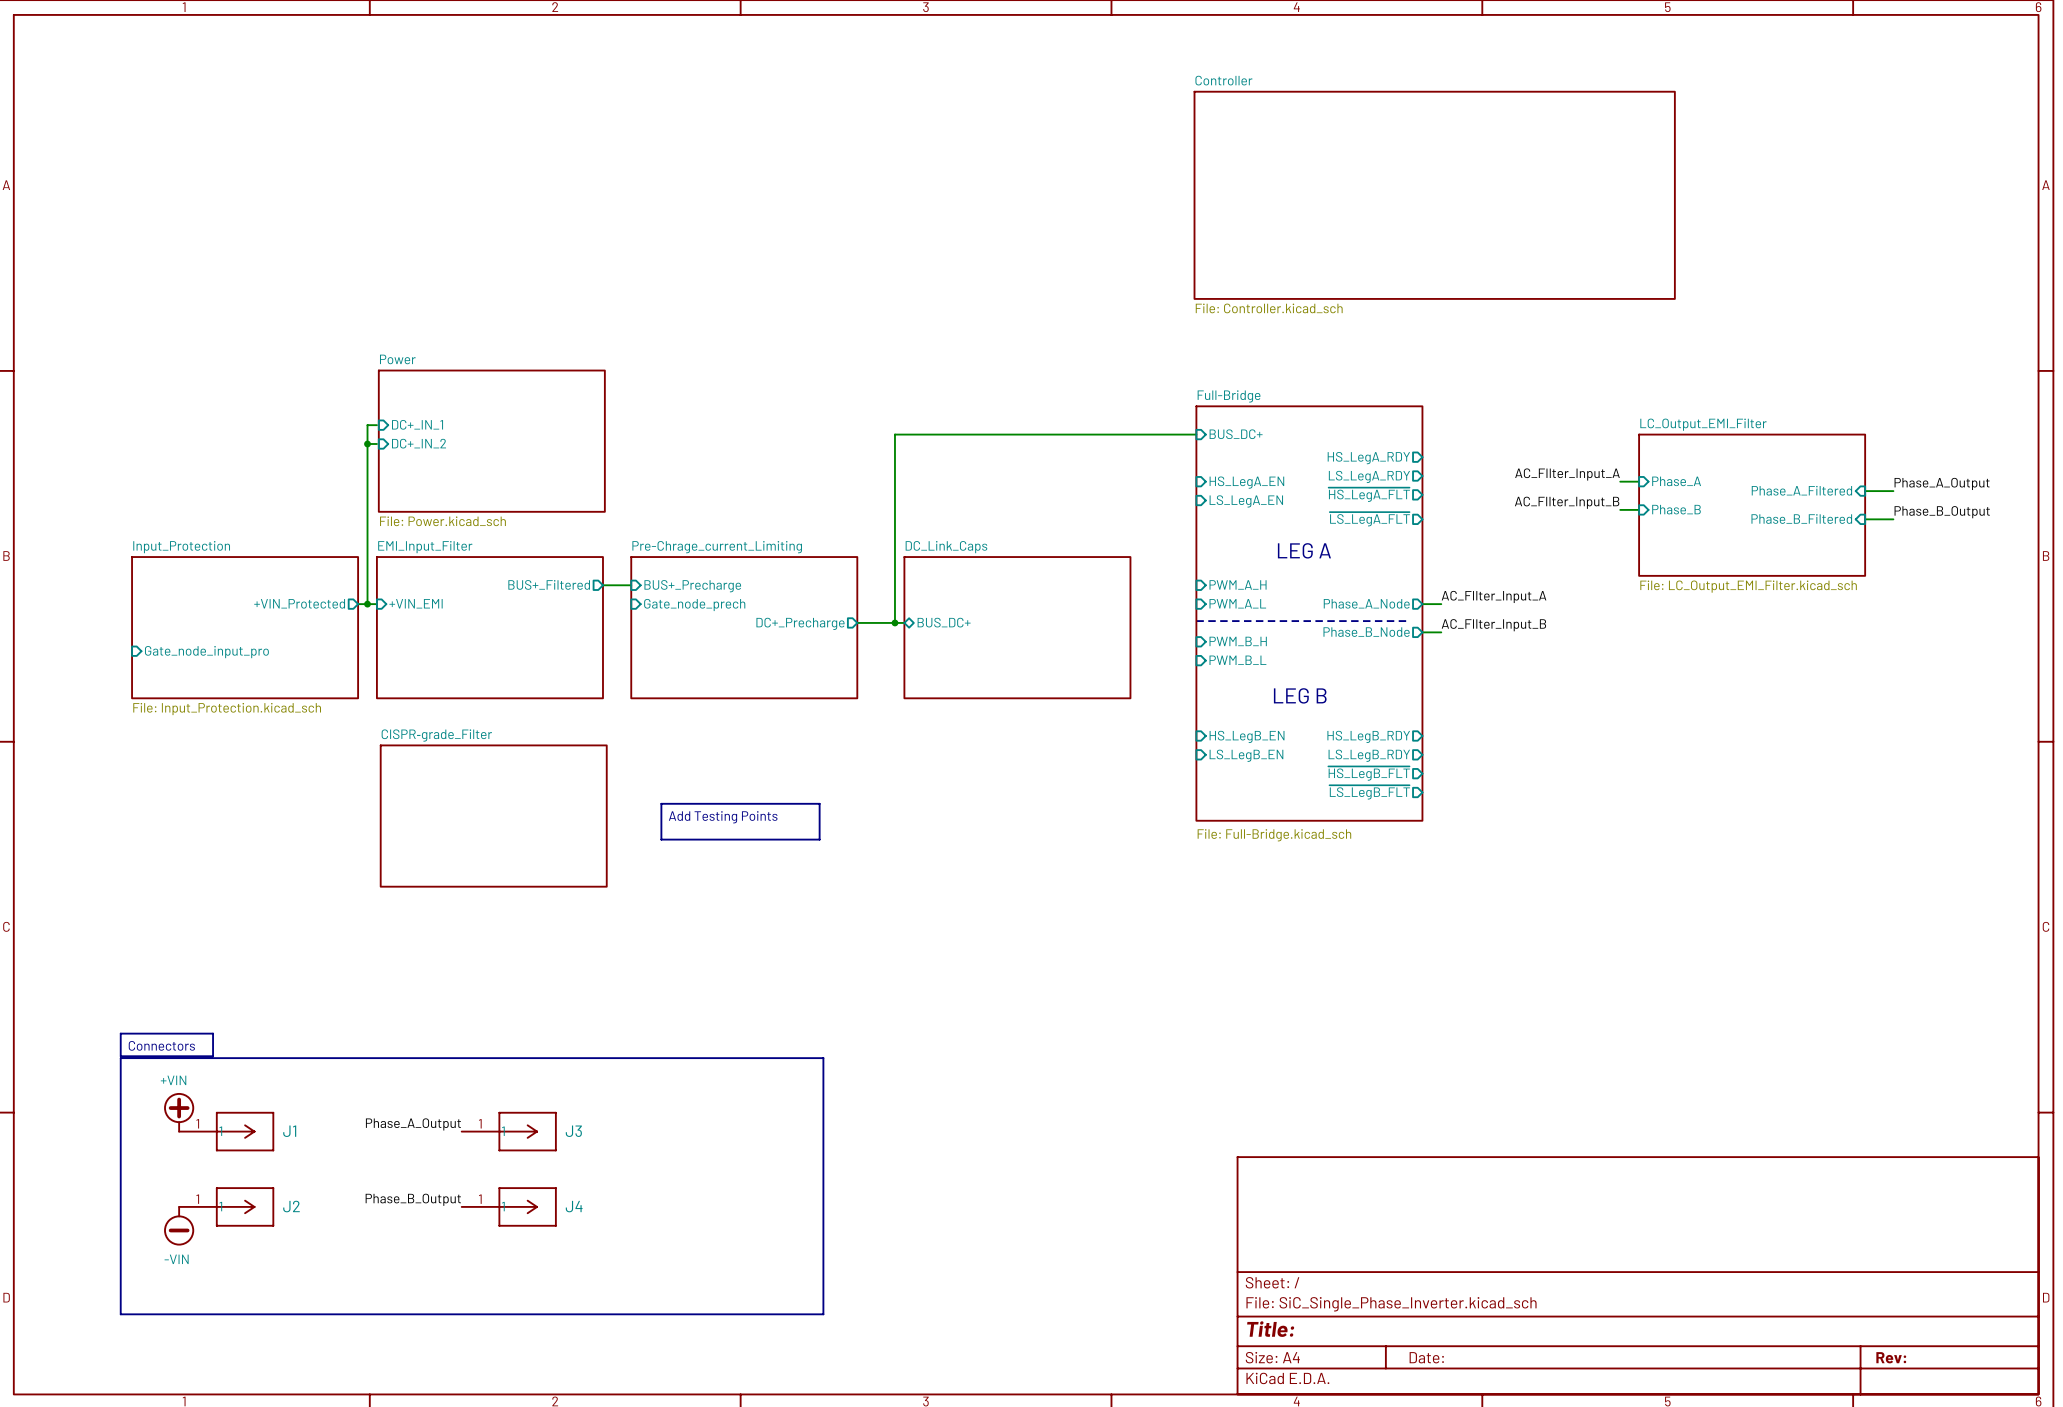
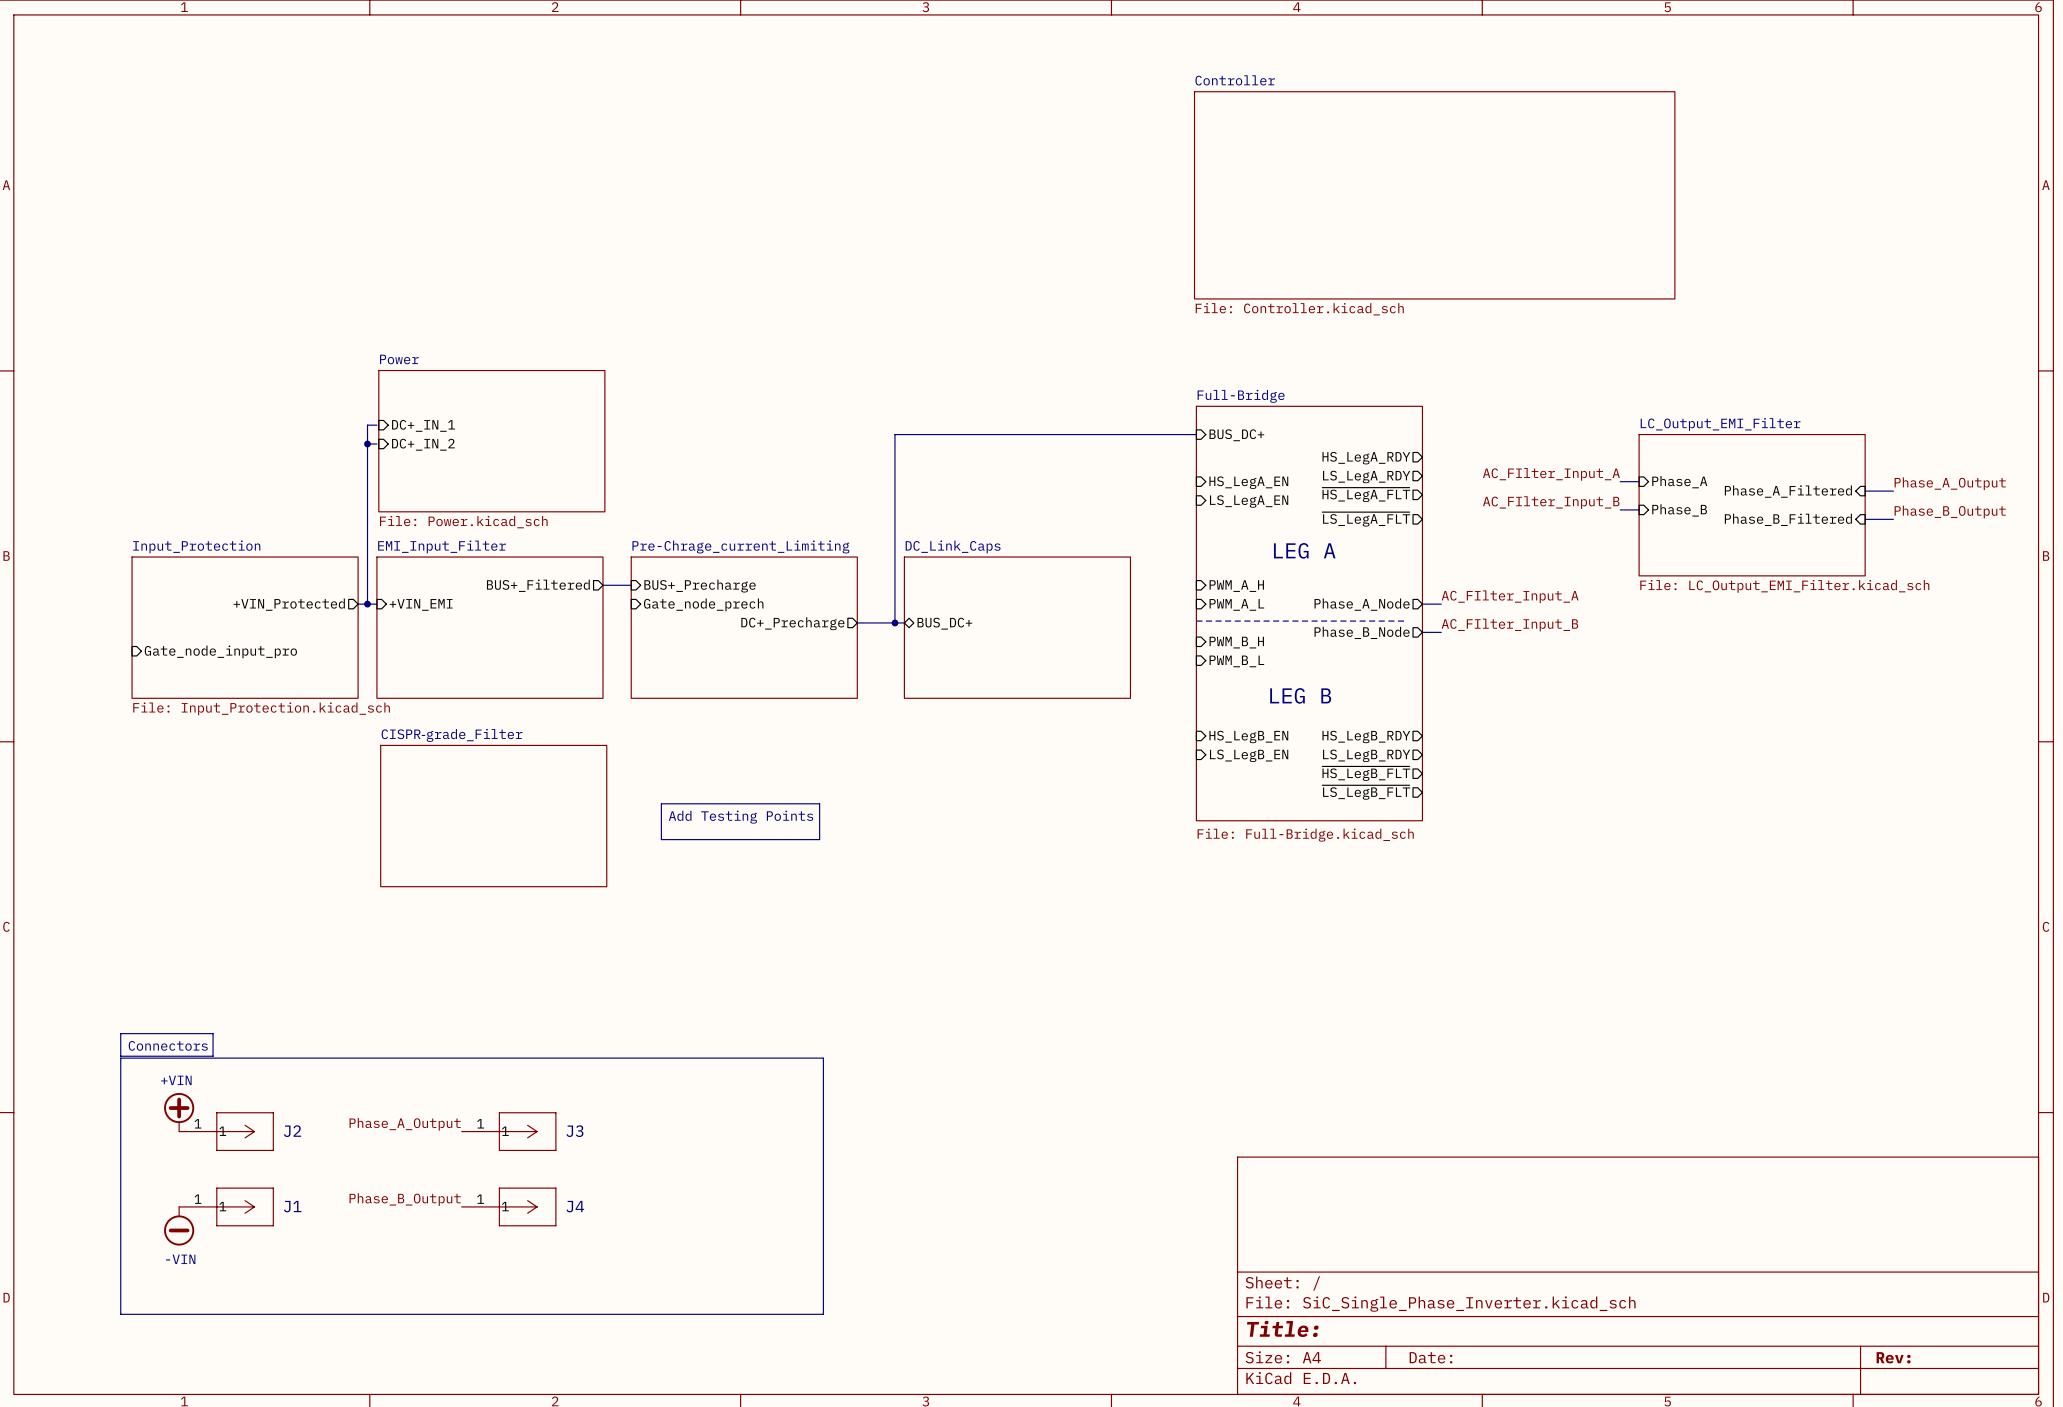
J1 name: J1 (289, 1131) -> J2 (292, 1131)
J2 name: J2 (291, 1206) -> J1 (292, 1206)

